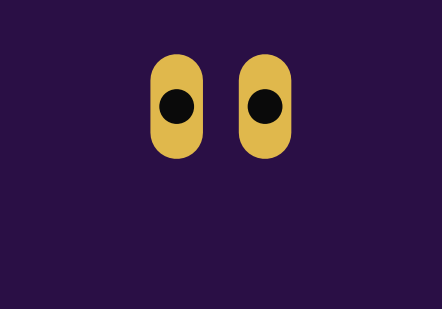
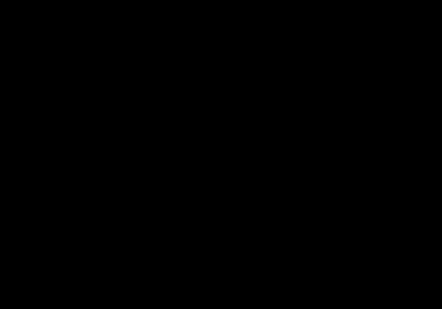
part: (220, 106) -> none

